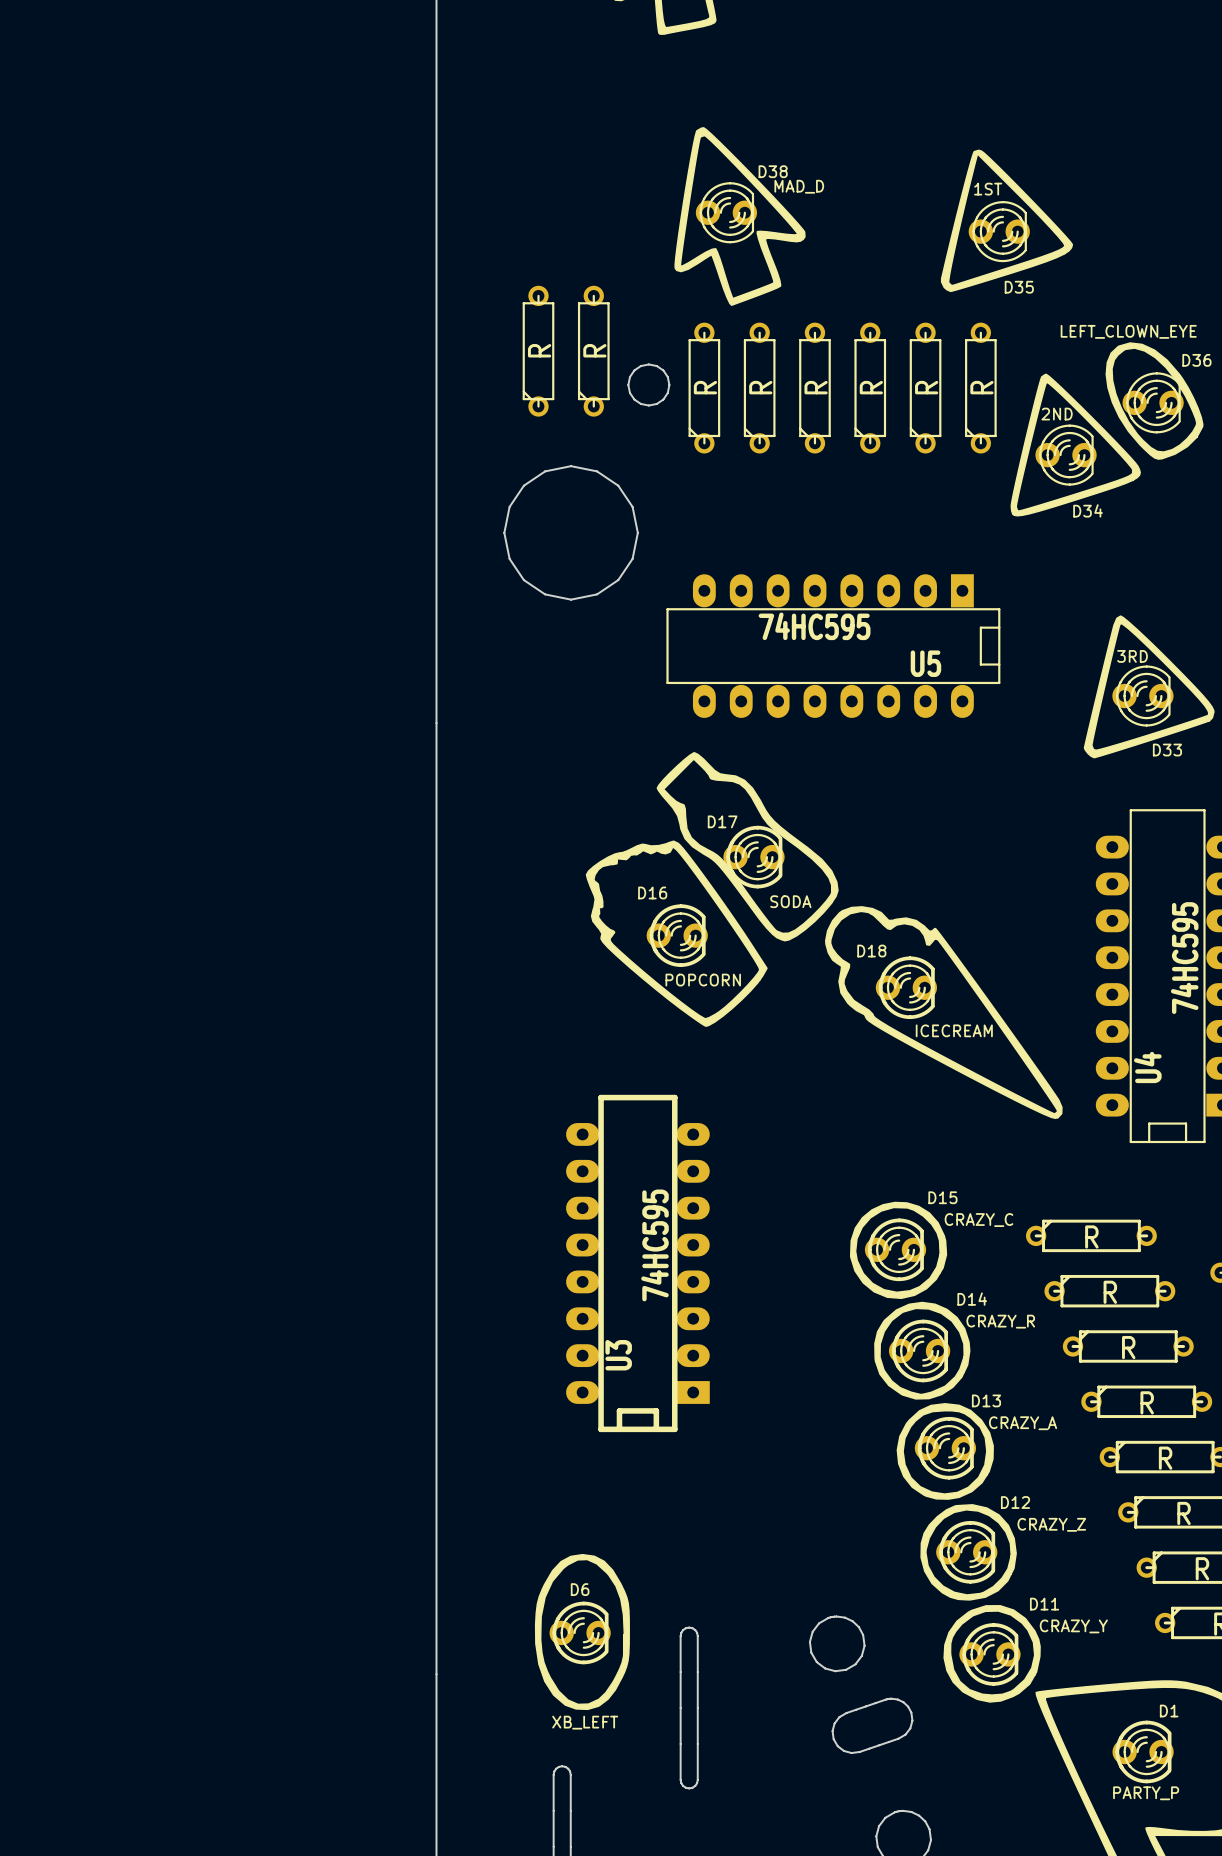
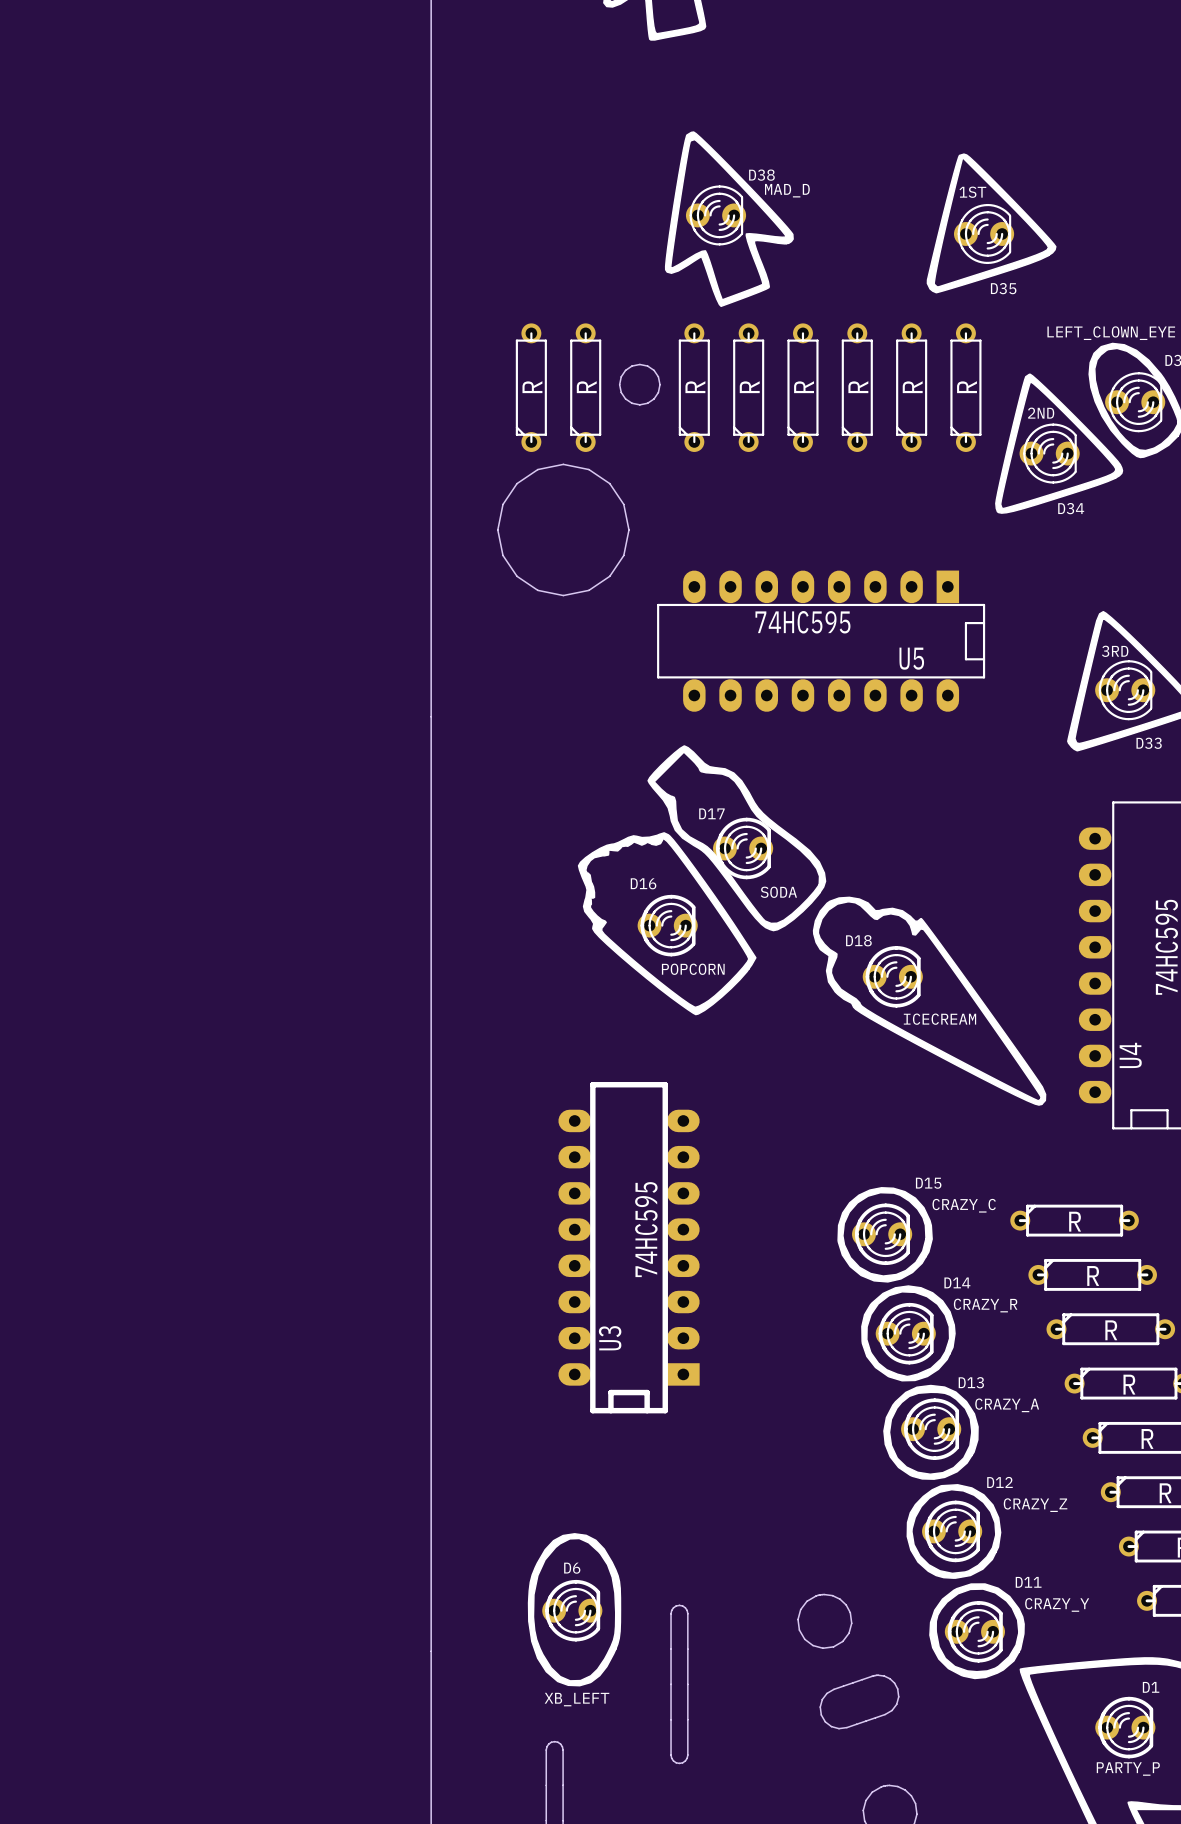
part: R (538, 351) -> none
part: R (593, 351) -> none
part: none -> R (531, 387)
part: none -> R (585, 387)

